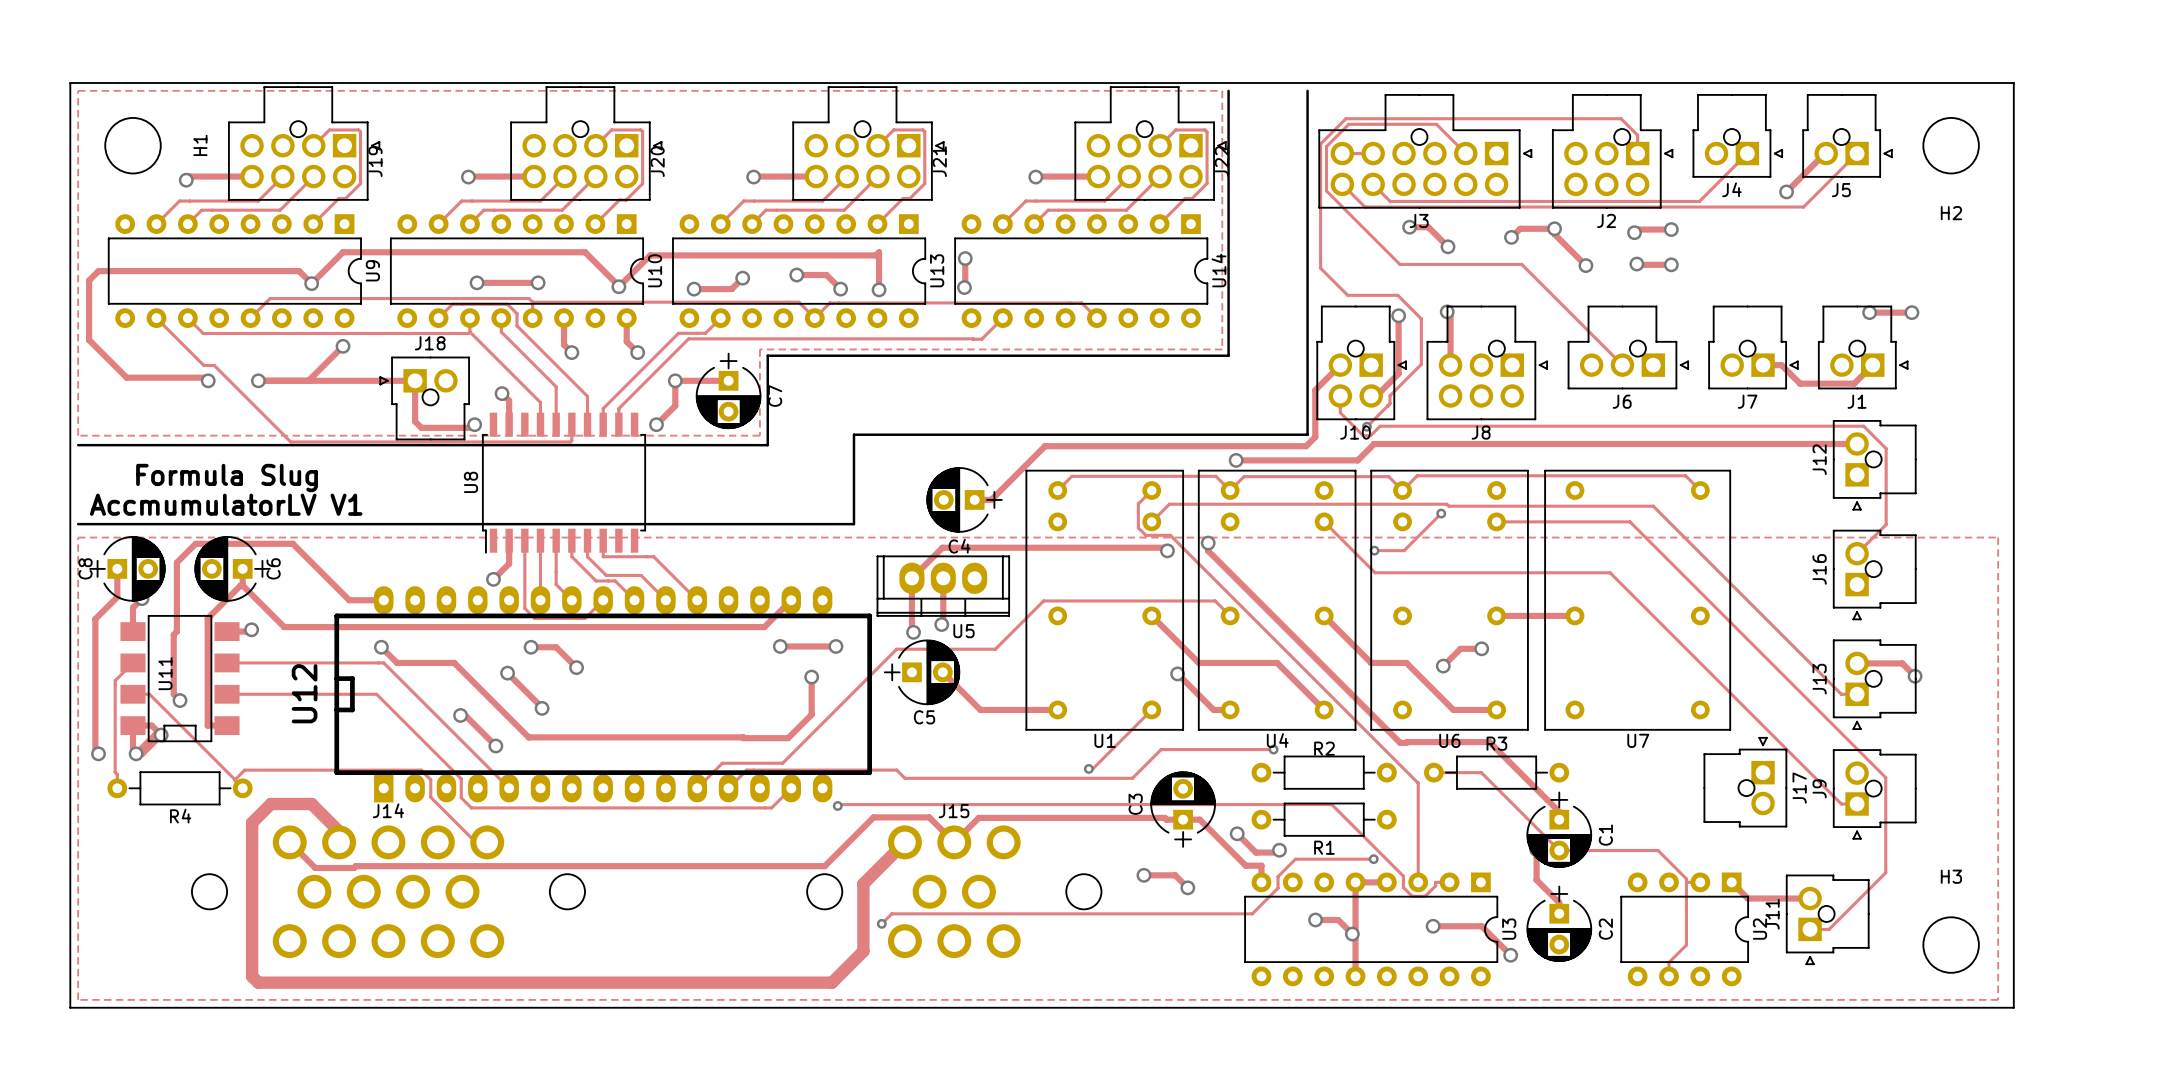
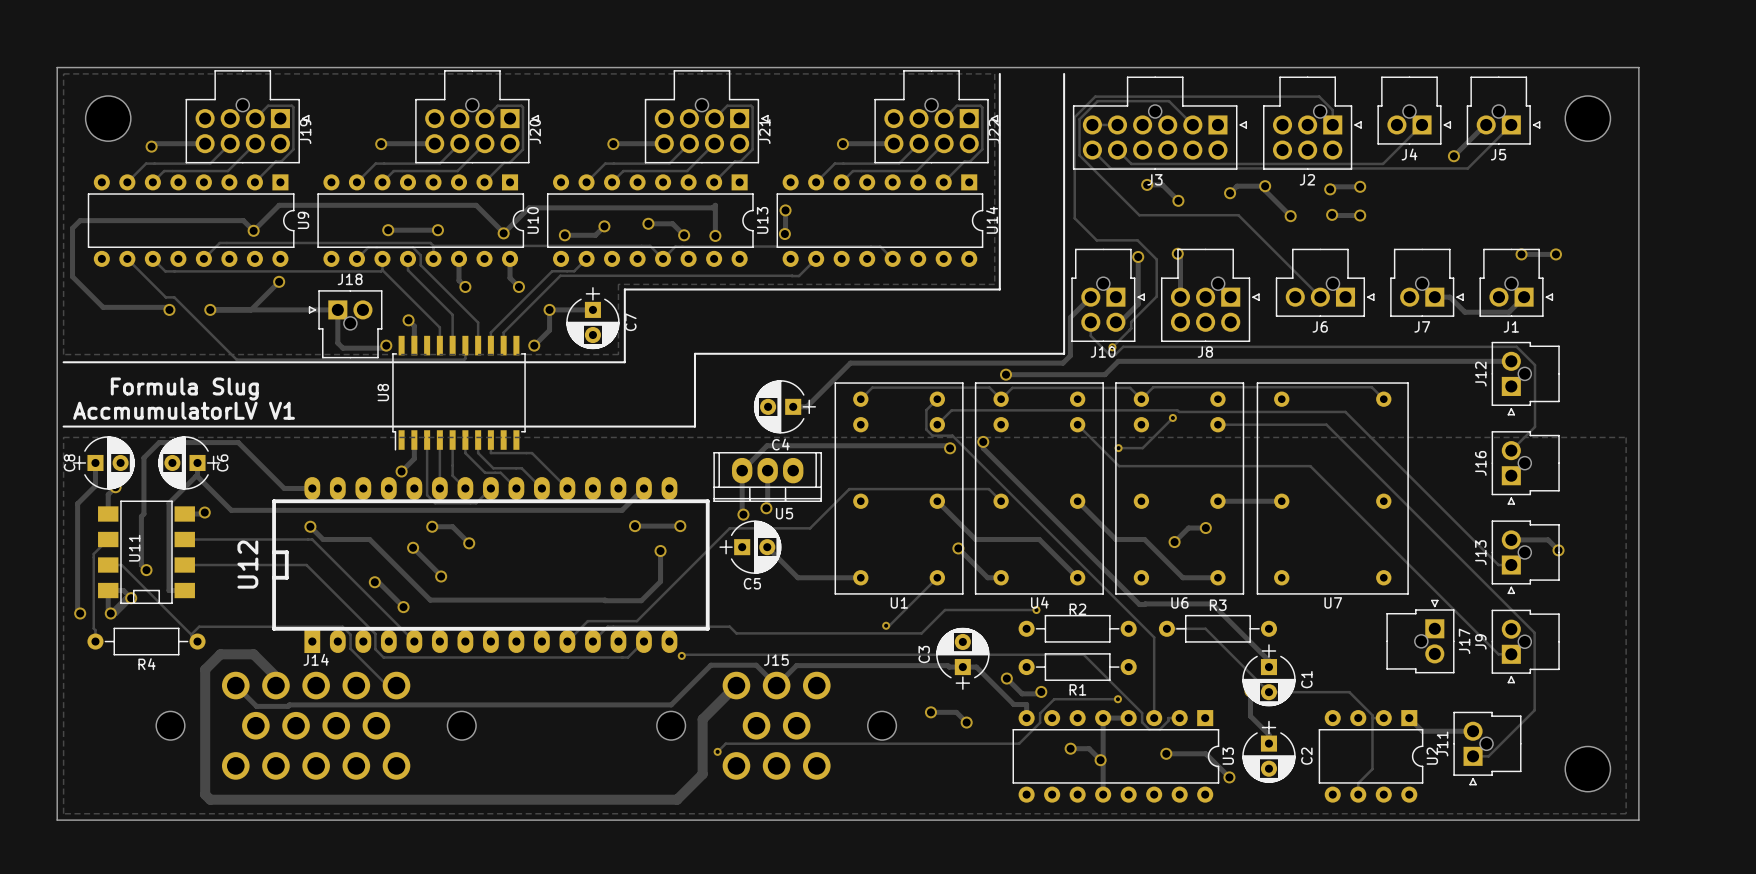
H1 name: H1 (200, 145) -> none
H2 name: H2 (1951, 213) -> none
H3 name: H3 (1951, 876) -> none

